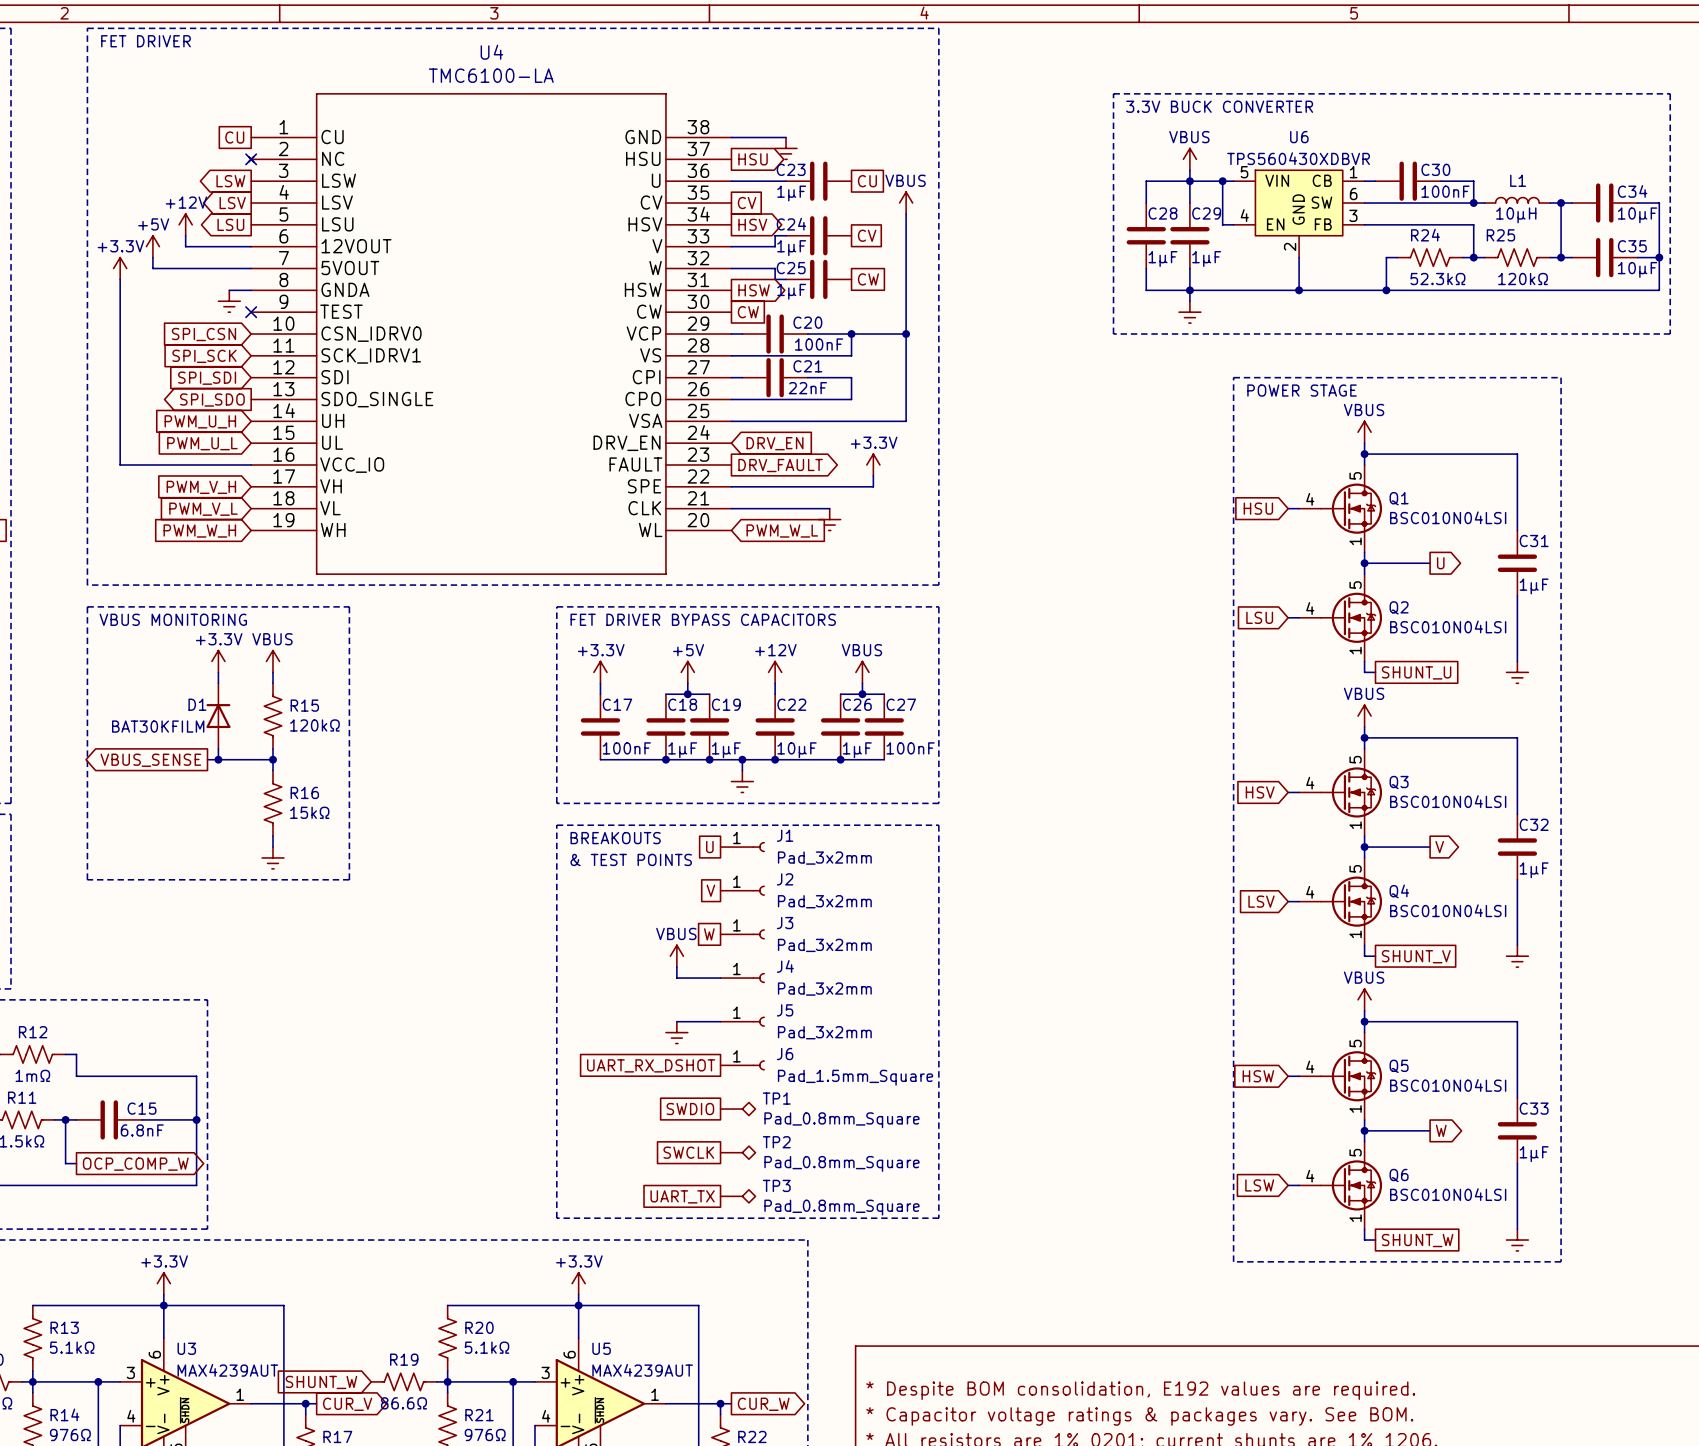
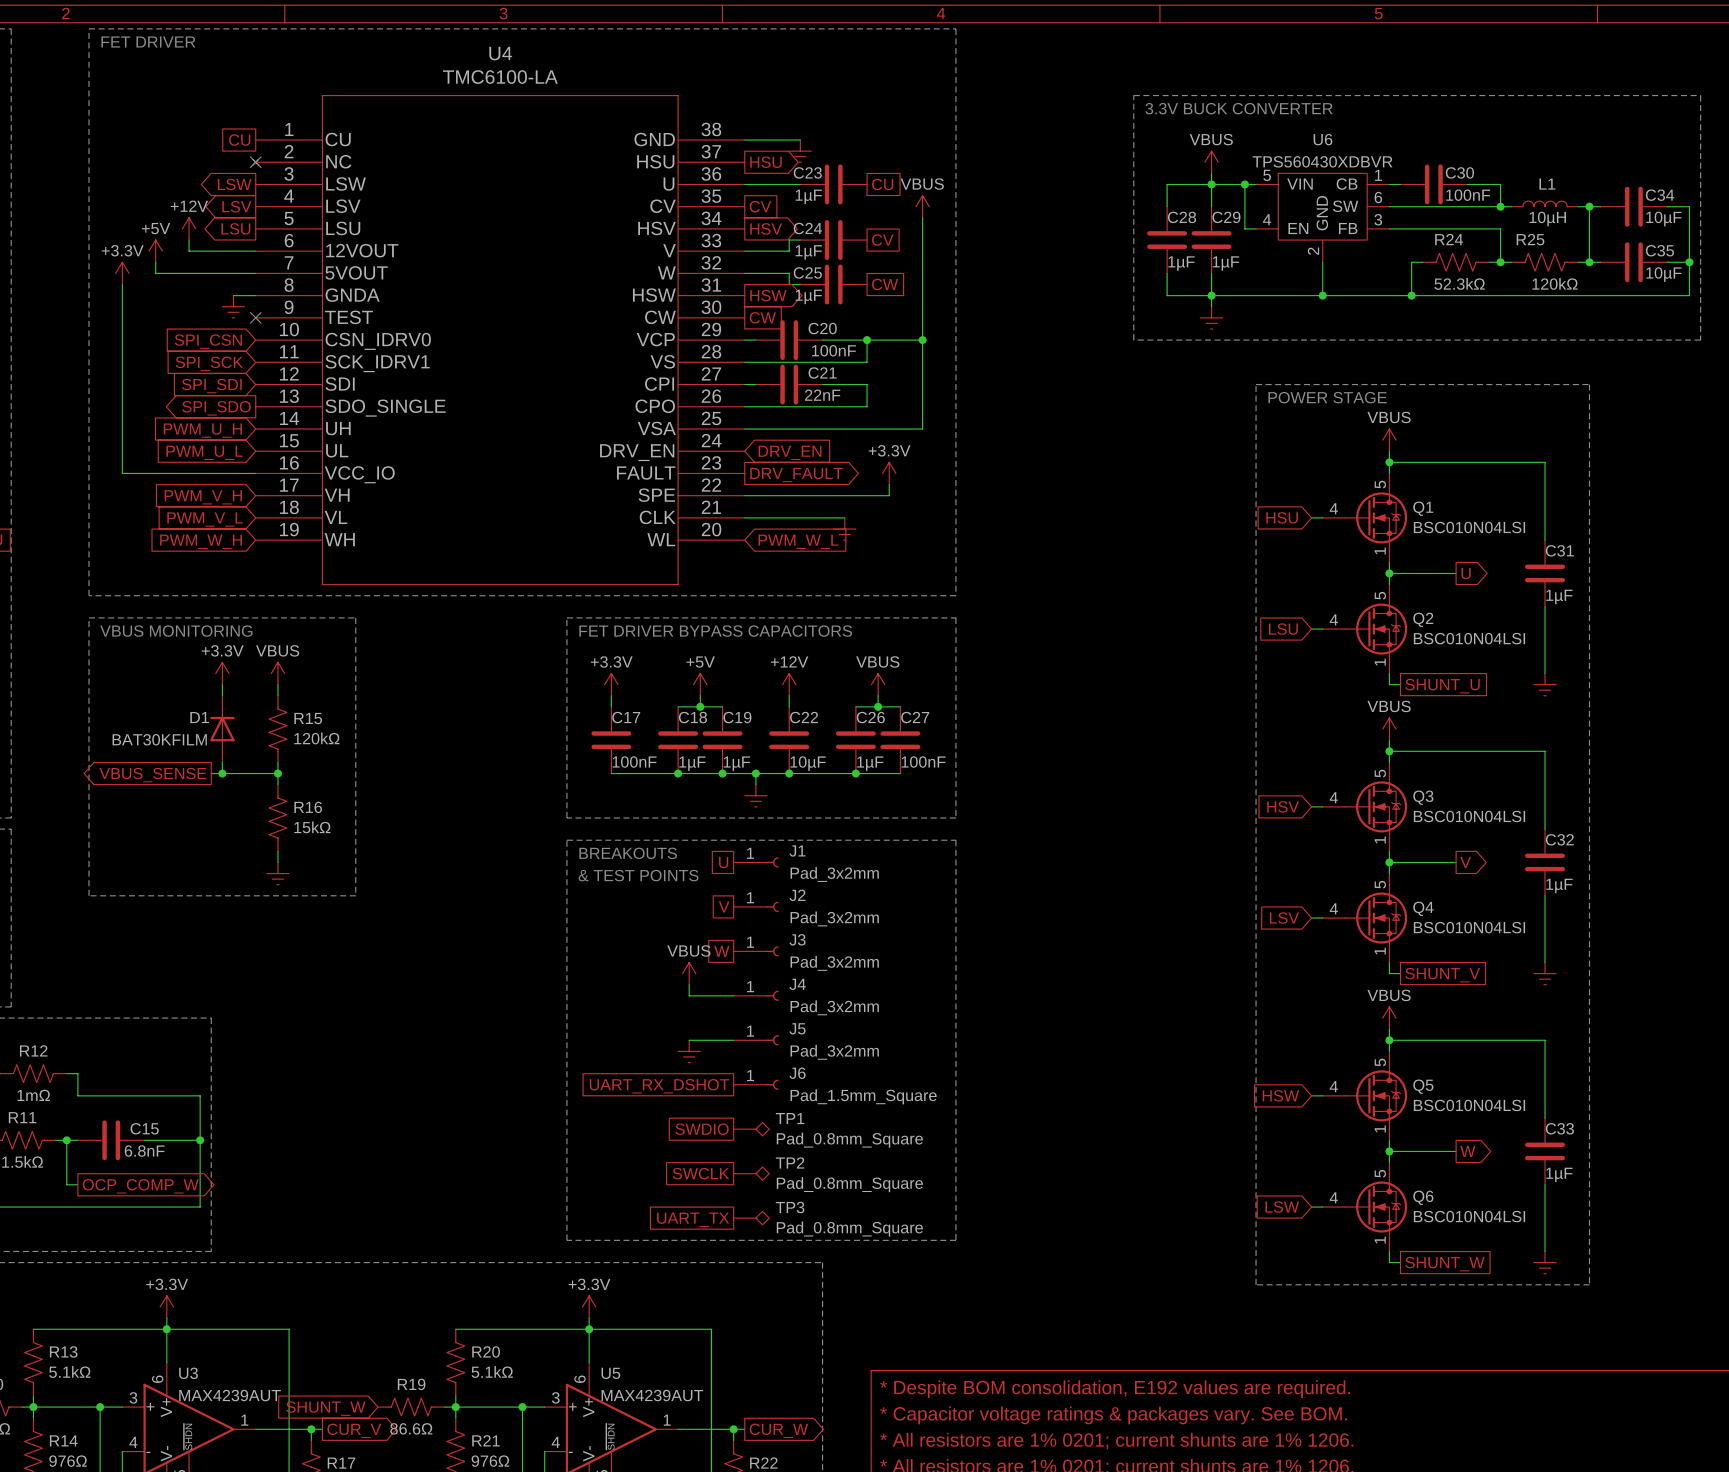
title block: none -> * Despite BOM consolidation, E192 values are required. (1115, 1389)
title block: * Despite BOM consolidation, E192 values are required. (1140, 1390) -> * Capacitor voltage ratings & packages vary. See BOM. (1113, 1415)
title block: * Capacitor voltage ratings & packages vary. See BOM. (1139, 1416) -> * All resistors are 1% 0201; current shunts are 1% 1206. (1116, 1440)

